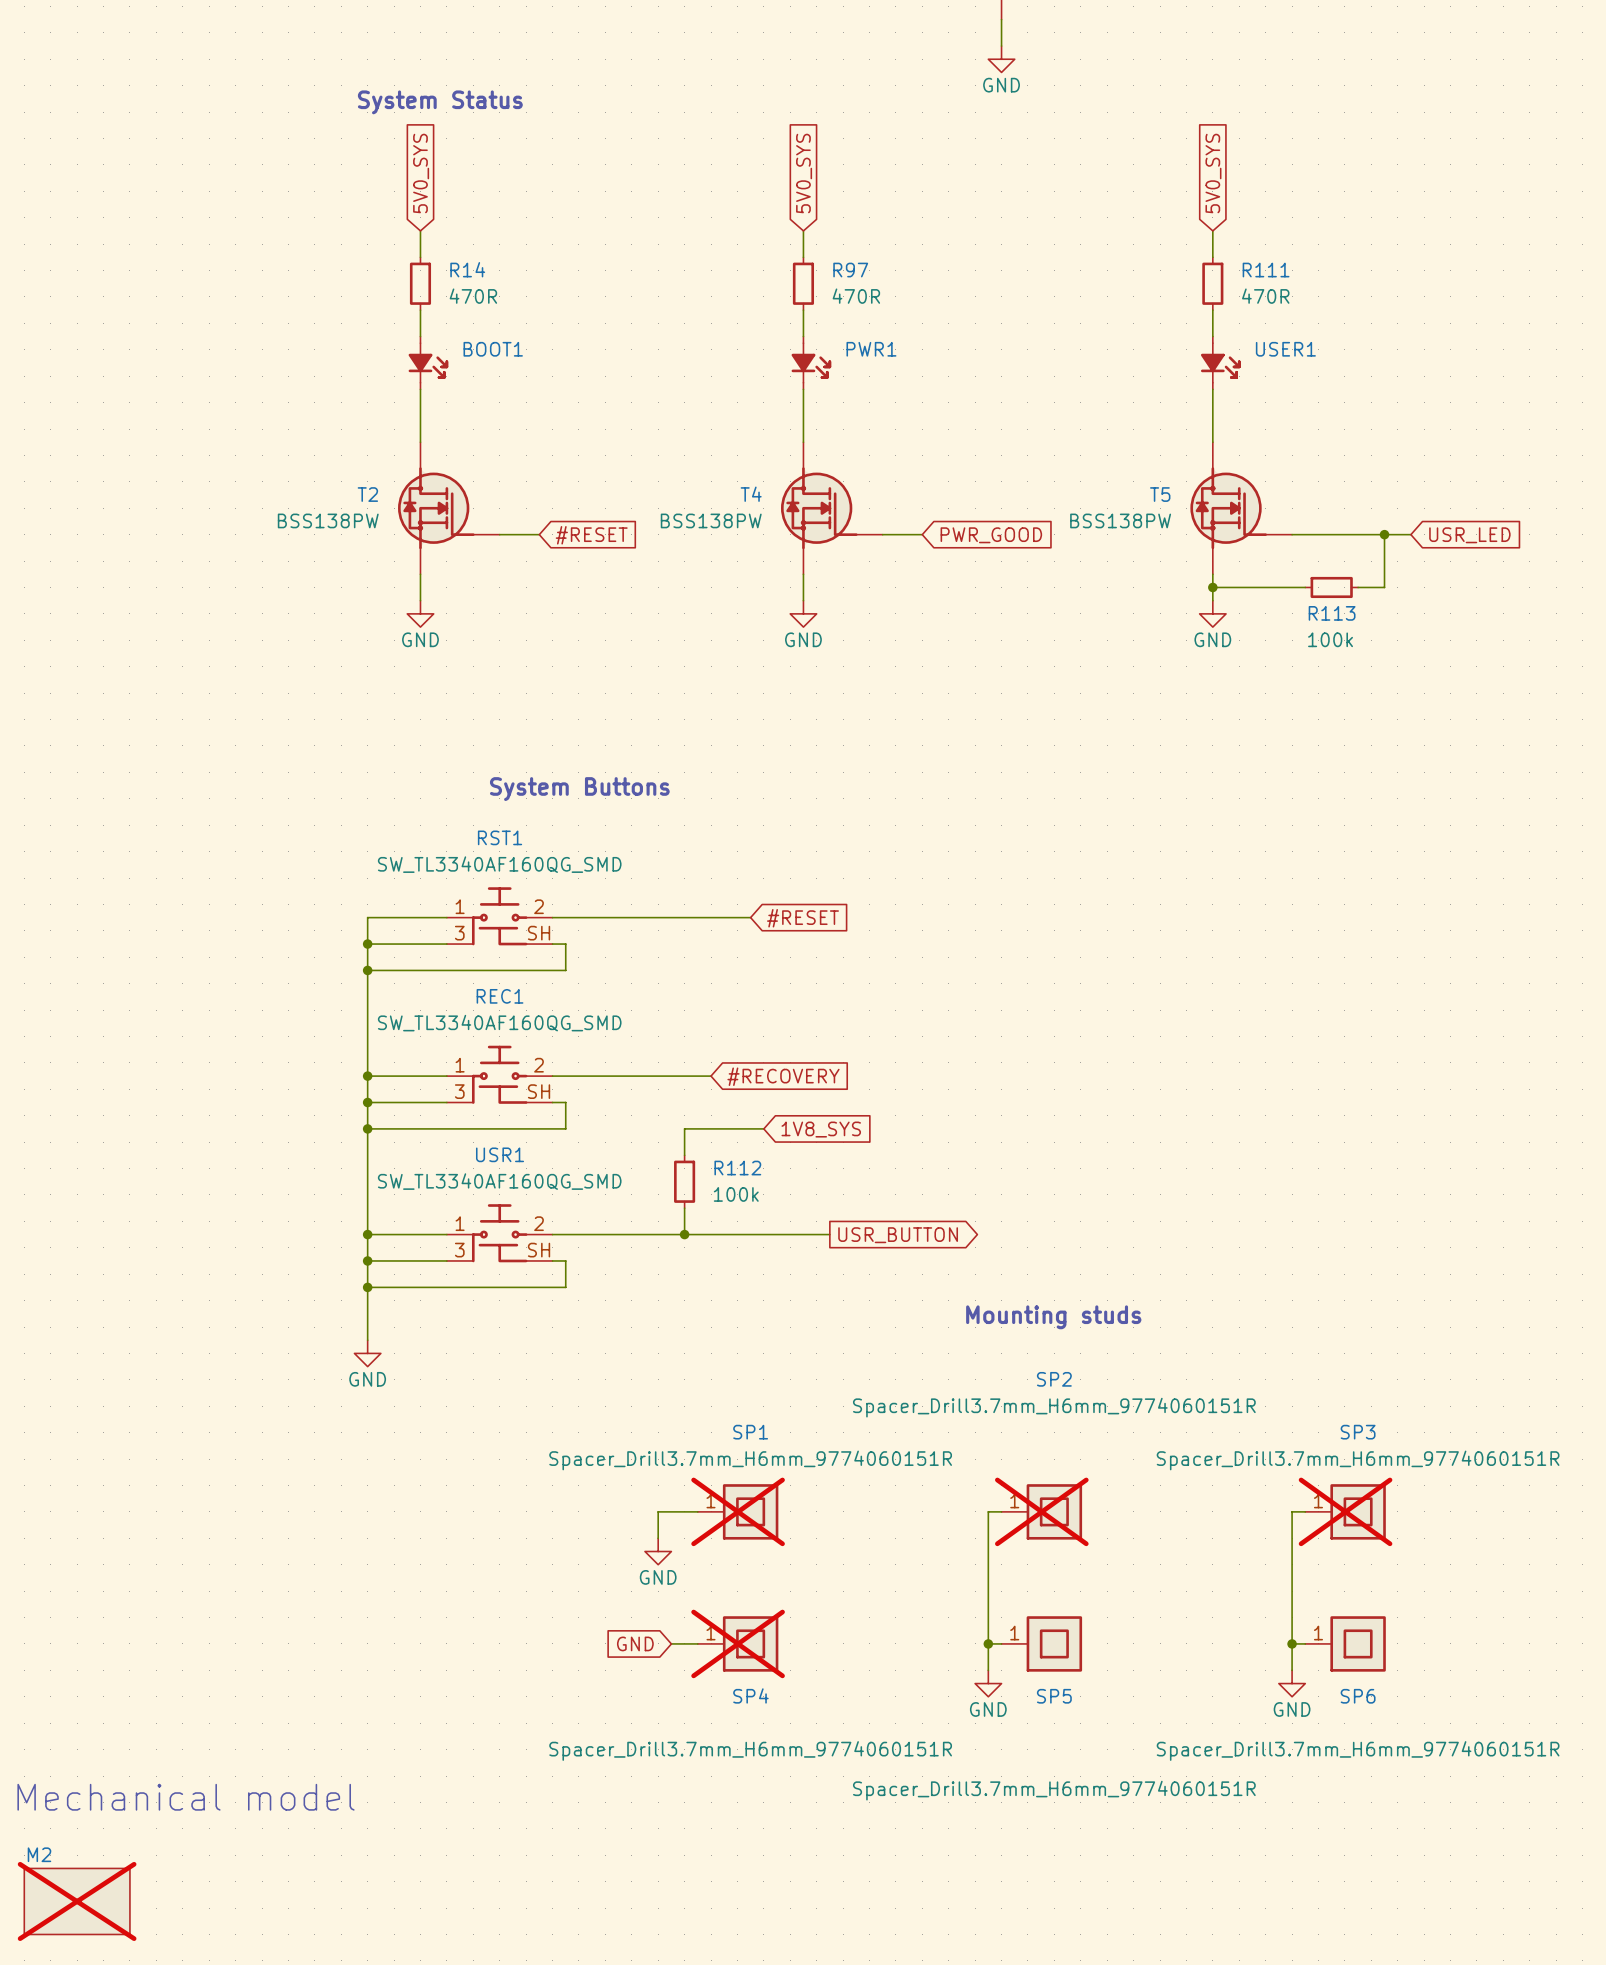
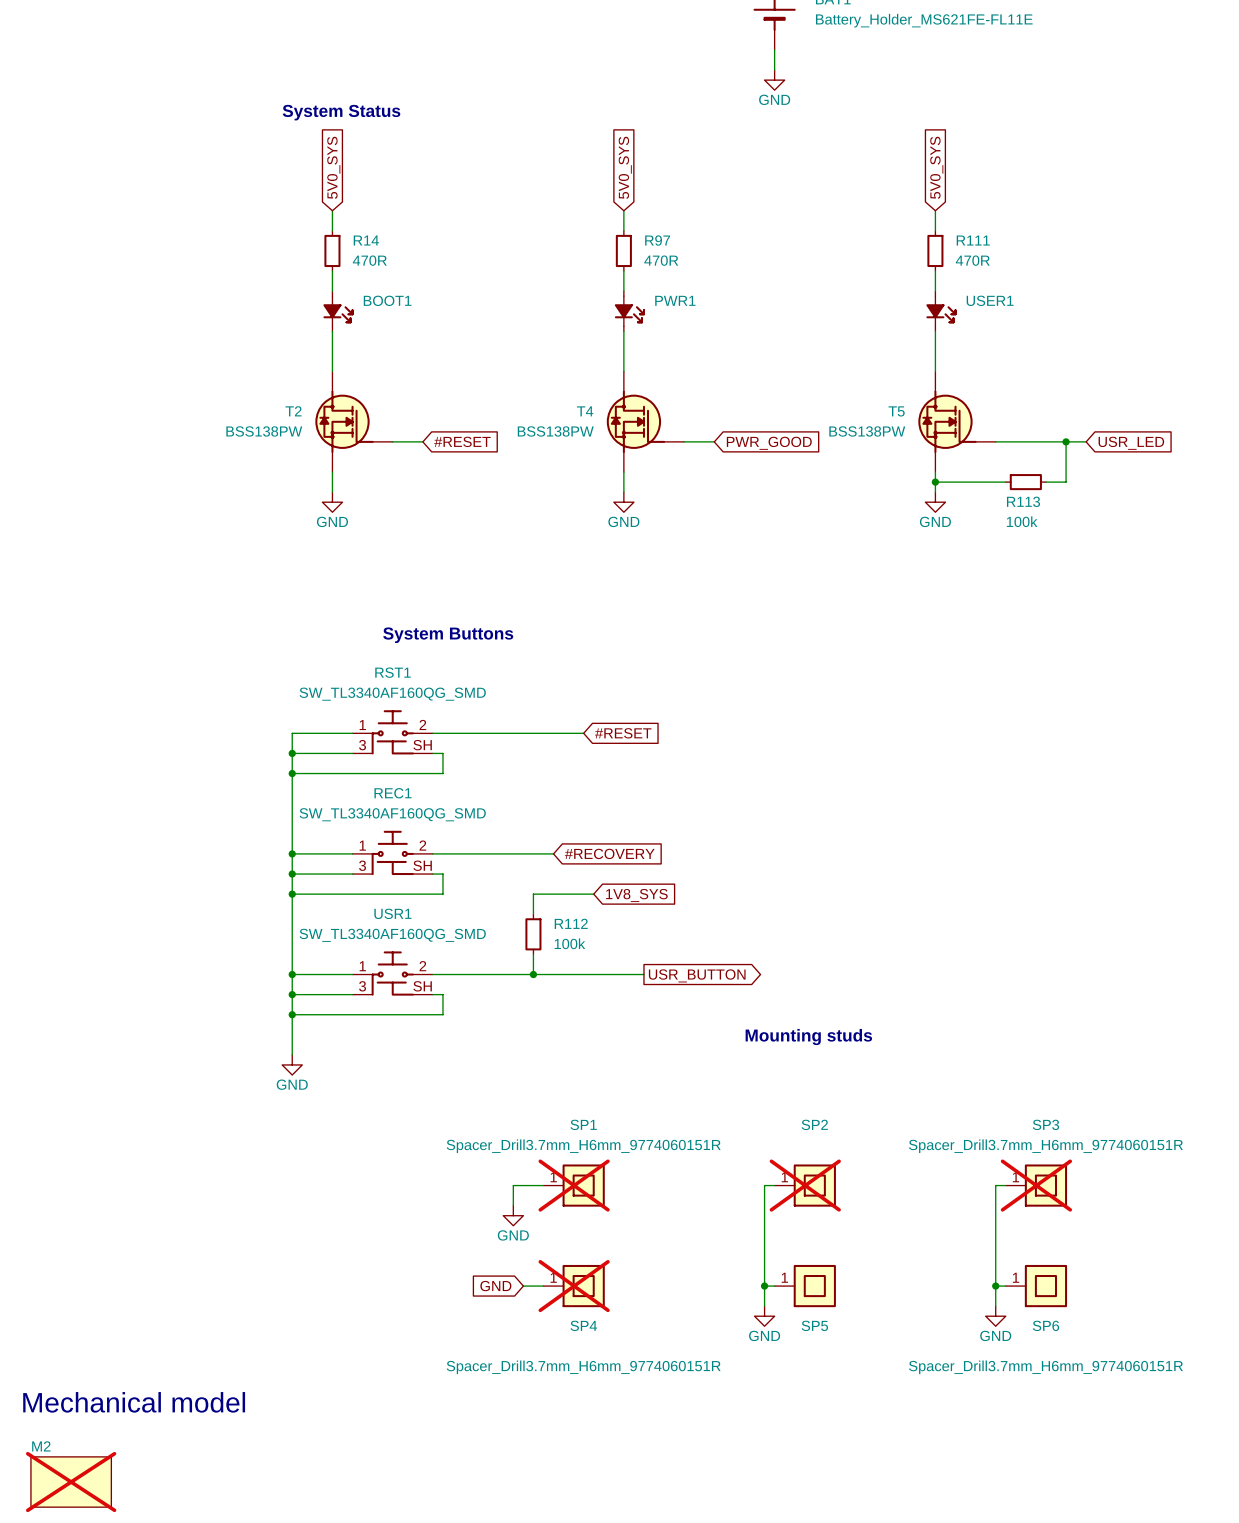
SP2 name position: SP2 (1054, 1379) -> SP2 (814, 1124)
SP2 value: Spacer_Drill3.7mm_H6mm_9774060151R (1054, 1407) -> none
SP5 value: Spacer_Drill3.7mm_H6mm_9774060151R (1054, 1790) -> none

